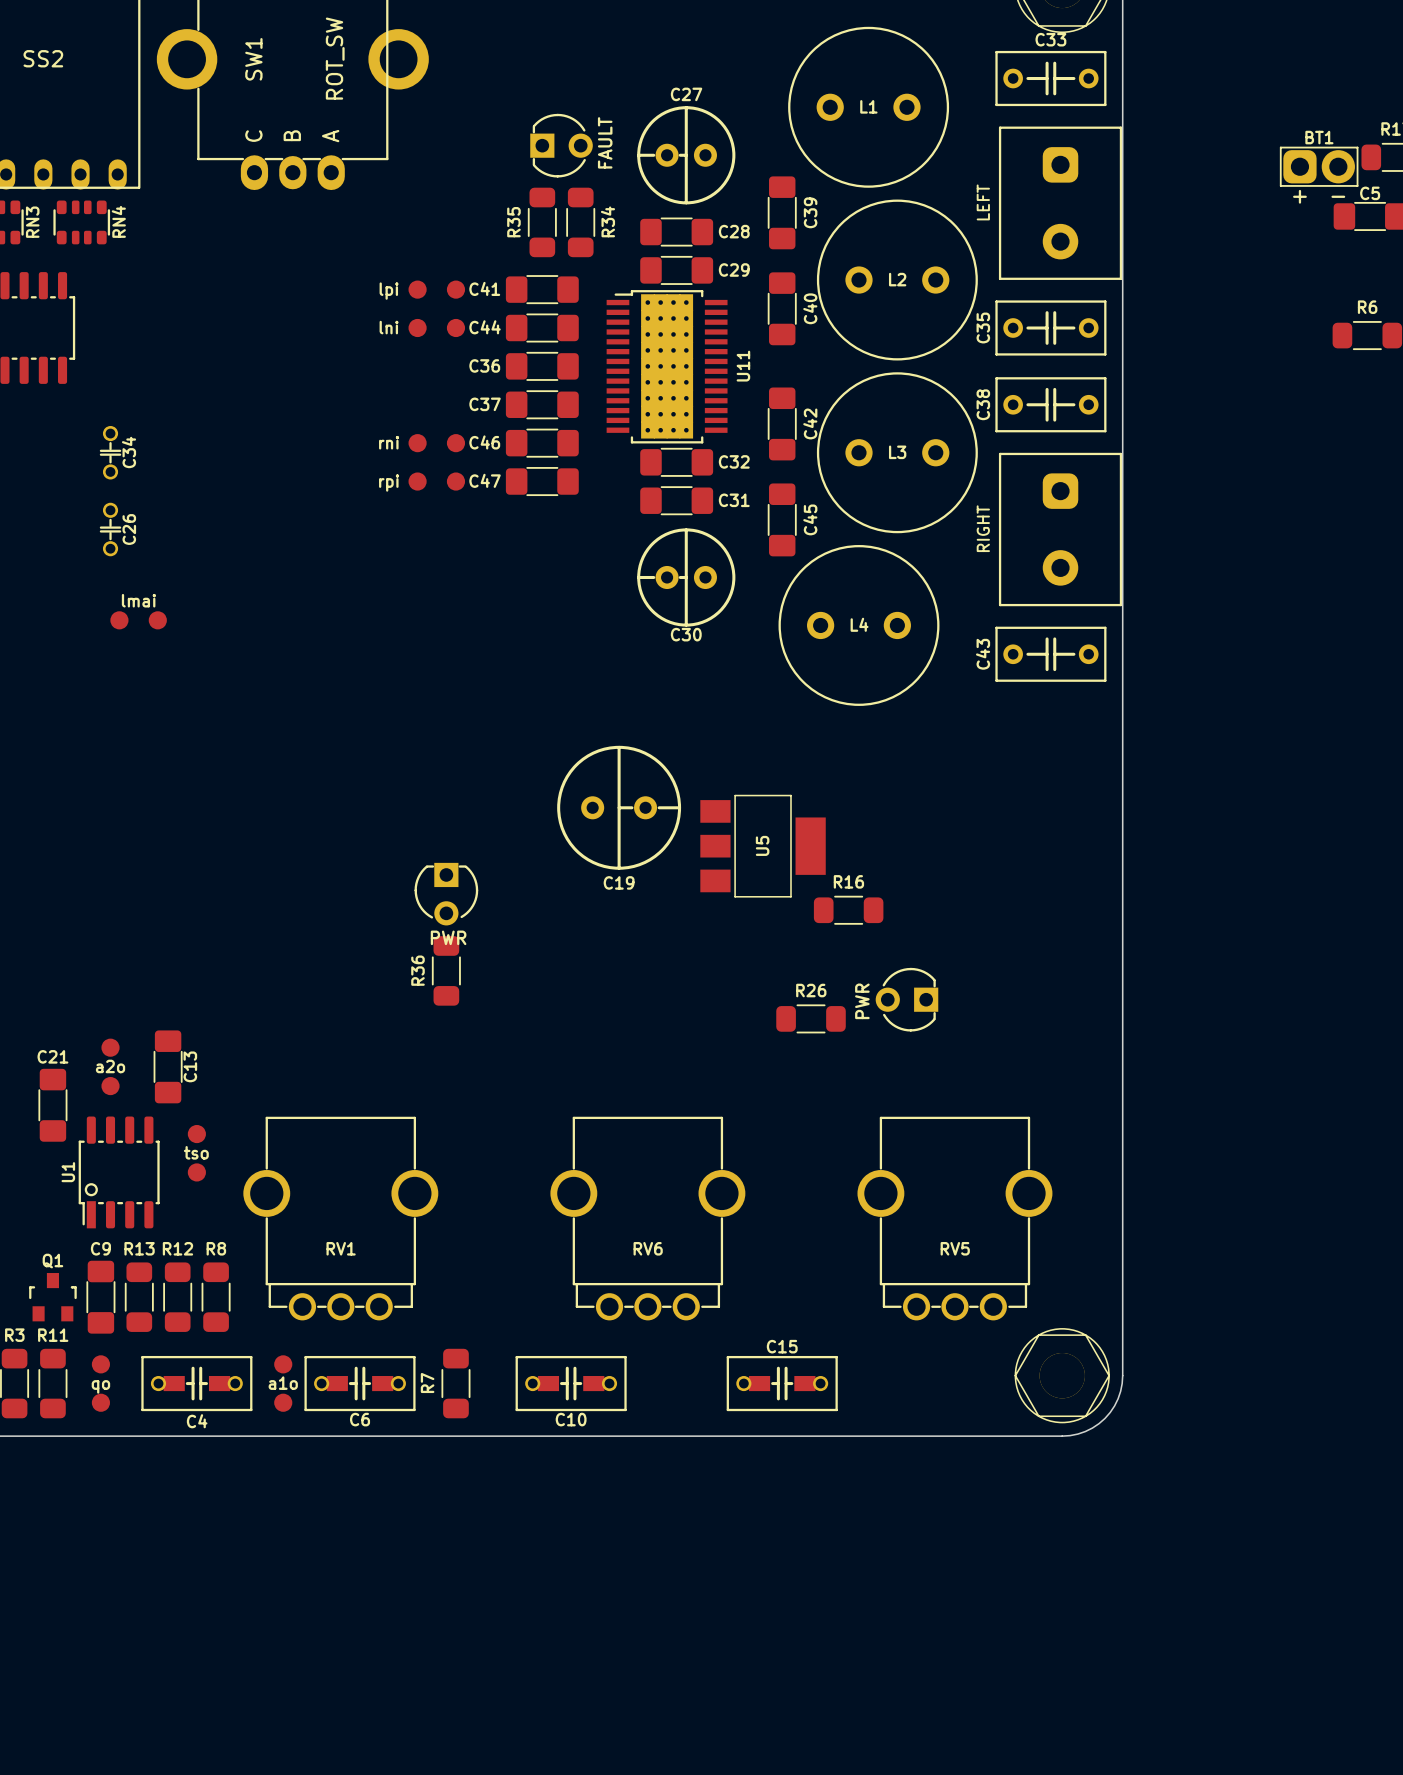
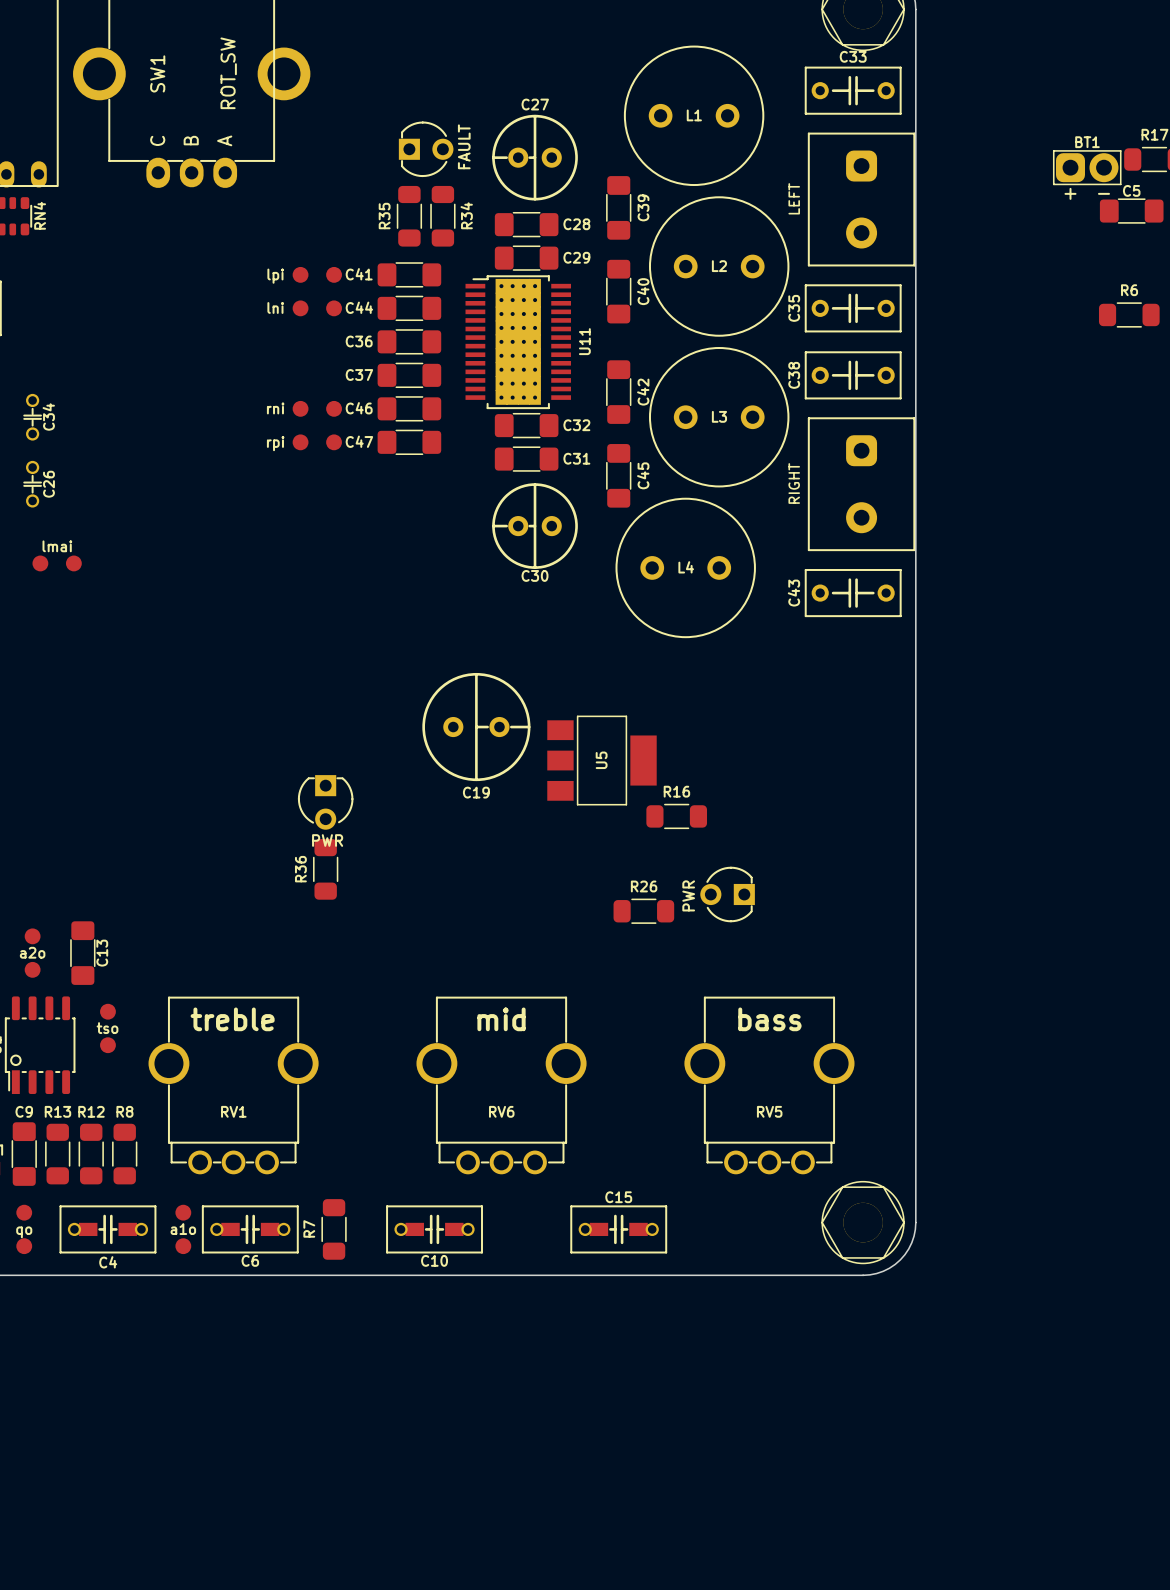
text: none -> treble (232, 1019)
text: none -> mid (501, 1019)
text: none -> bass (769, 1019)

